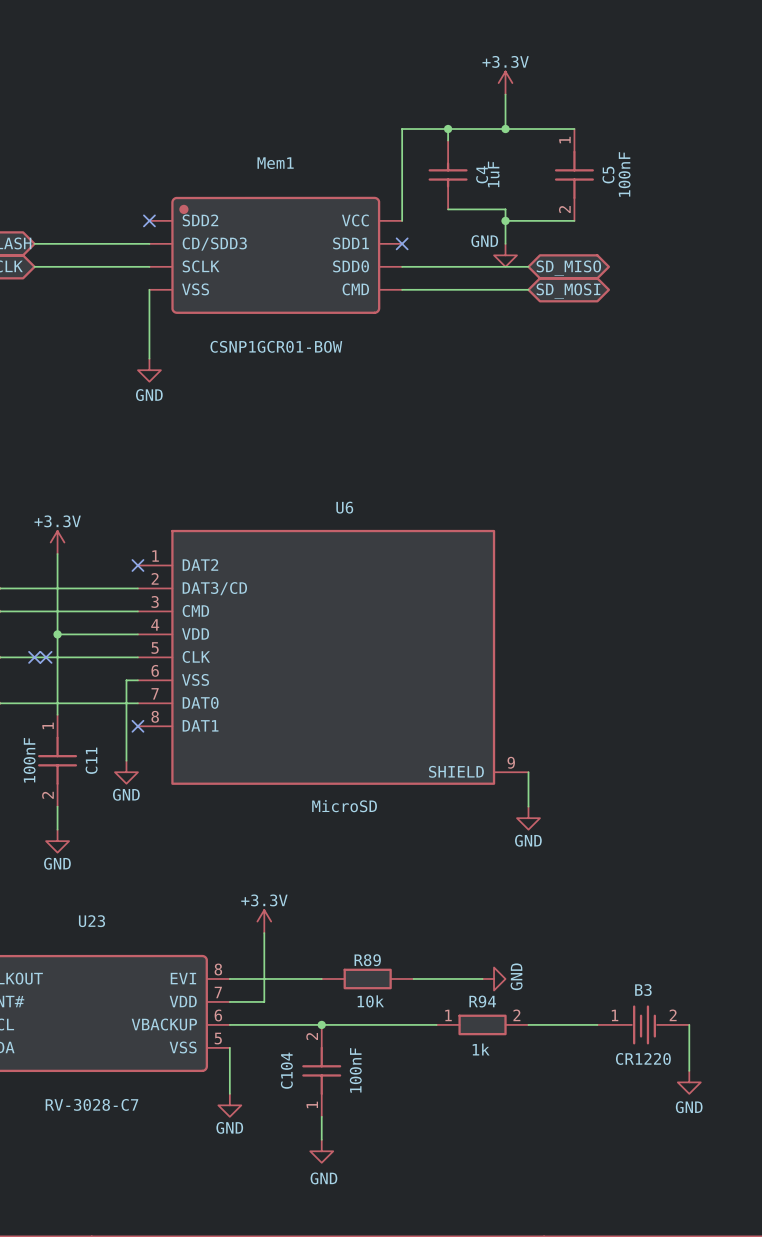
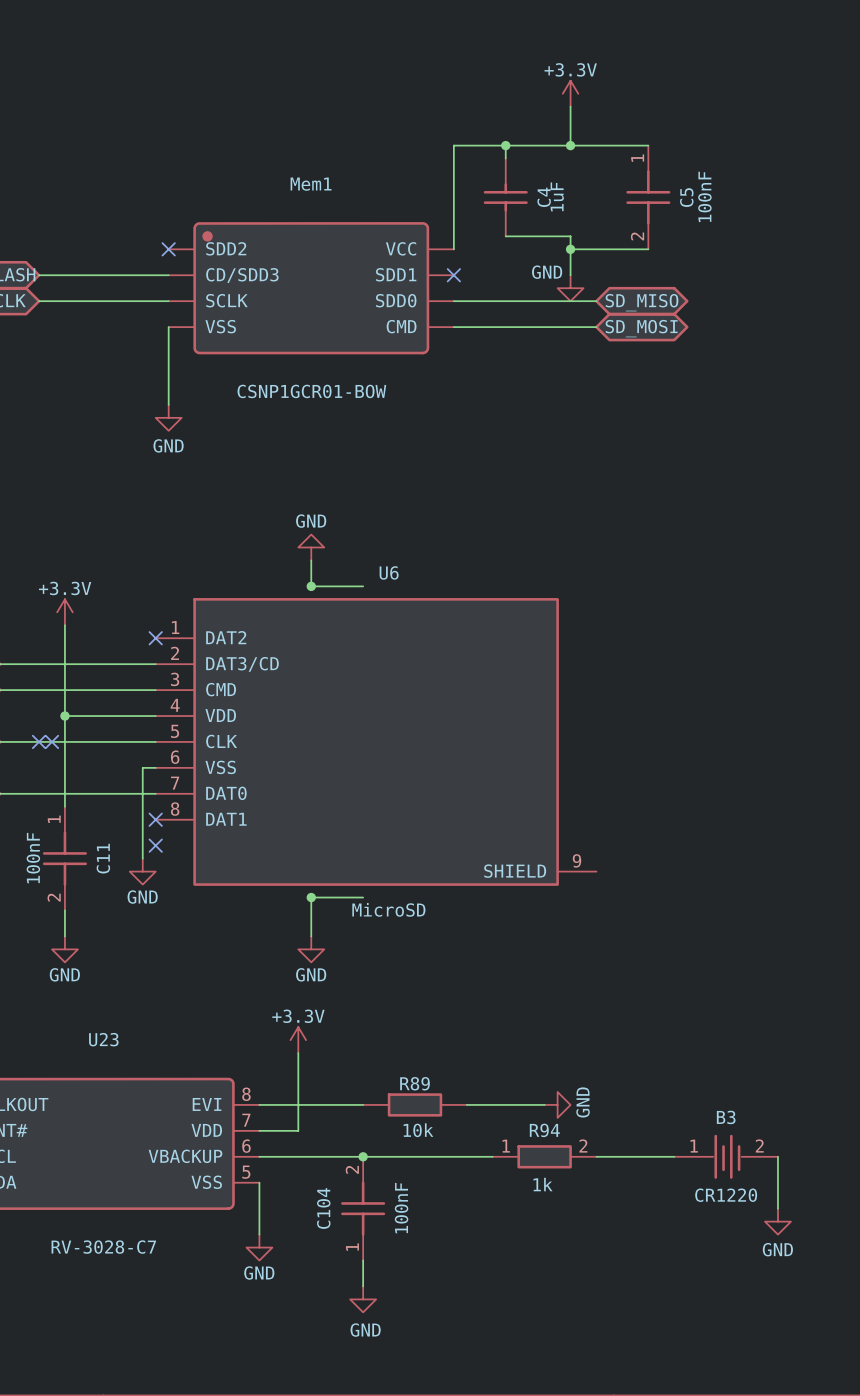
power symbol: none -> GND (311, 547)
wire: none -> (311, 560) (311, 586) (363, 586)
junction: none -> (311, 586)
no-connect mark: none -> (155, 845)
wire: (528, 772) (528, 806) -> none
junction: none -> (311, 897)
wire: none -> (363, 897) (311, 897) (311, 936)
power symbol: GND (528, 818) -> none
power symbol: none -> GND (311, 949)

